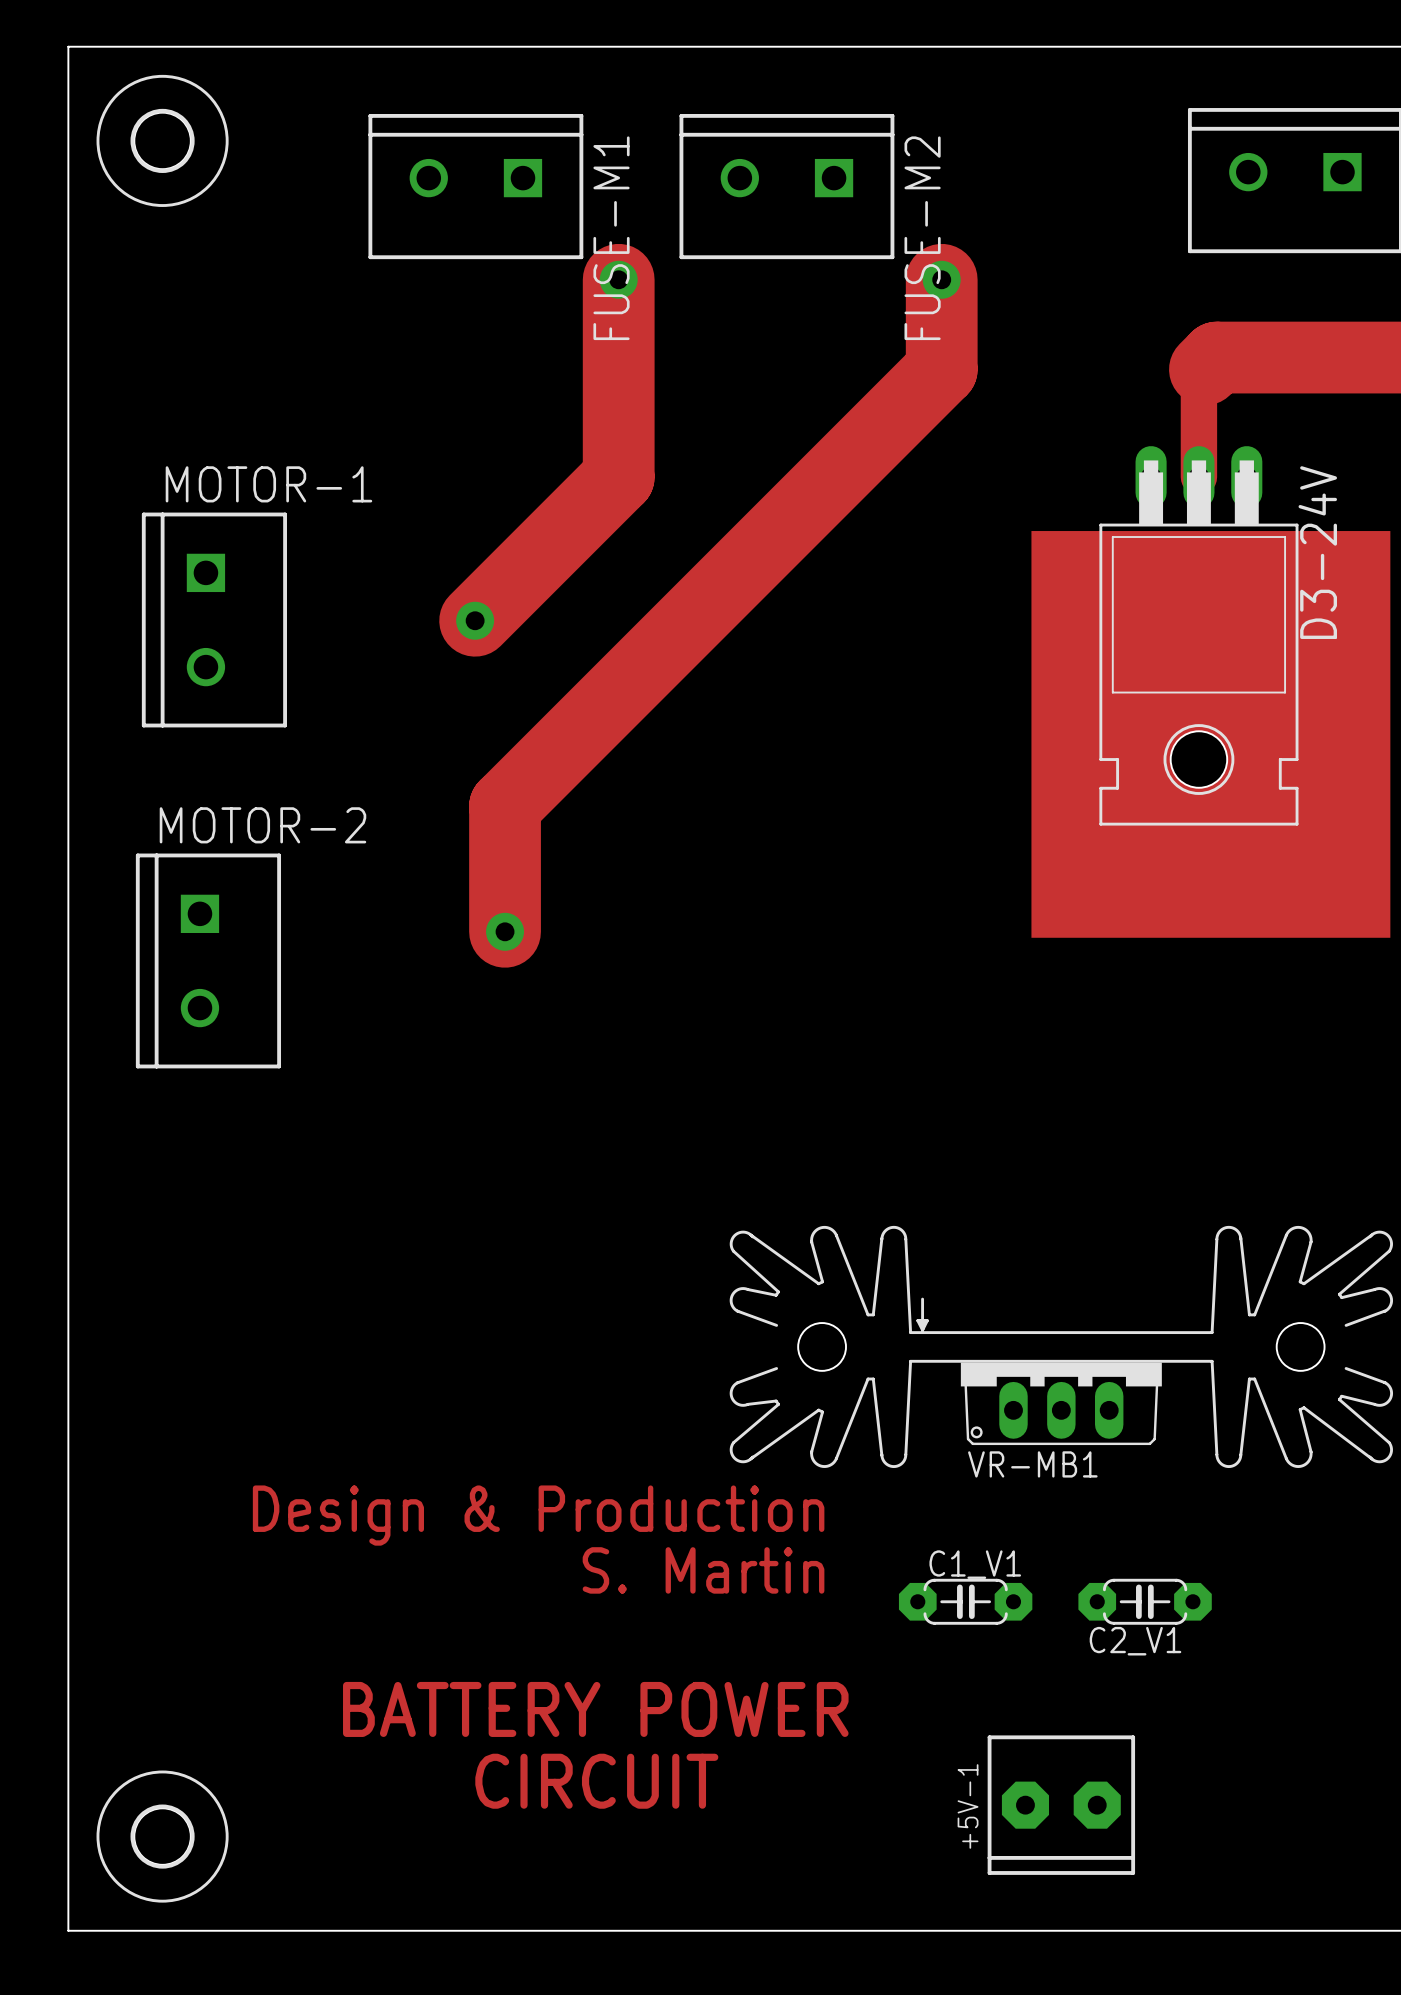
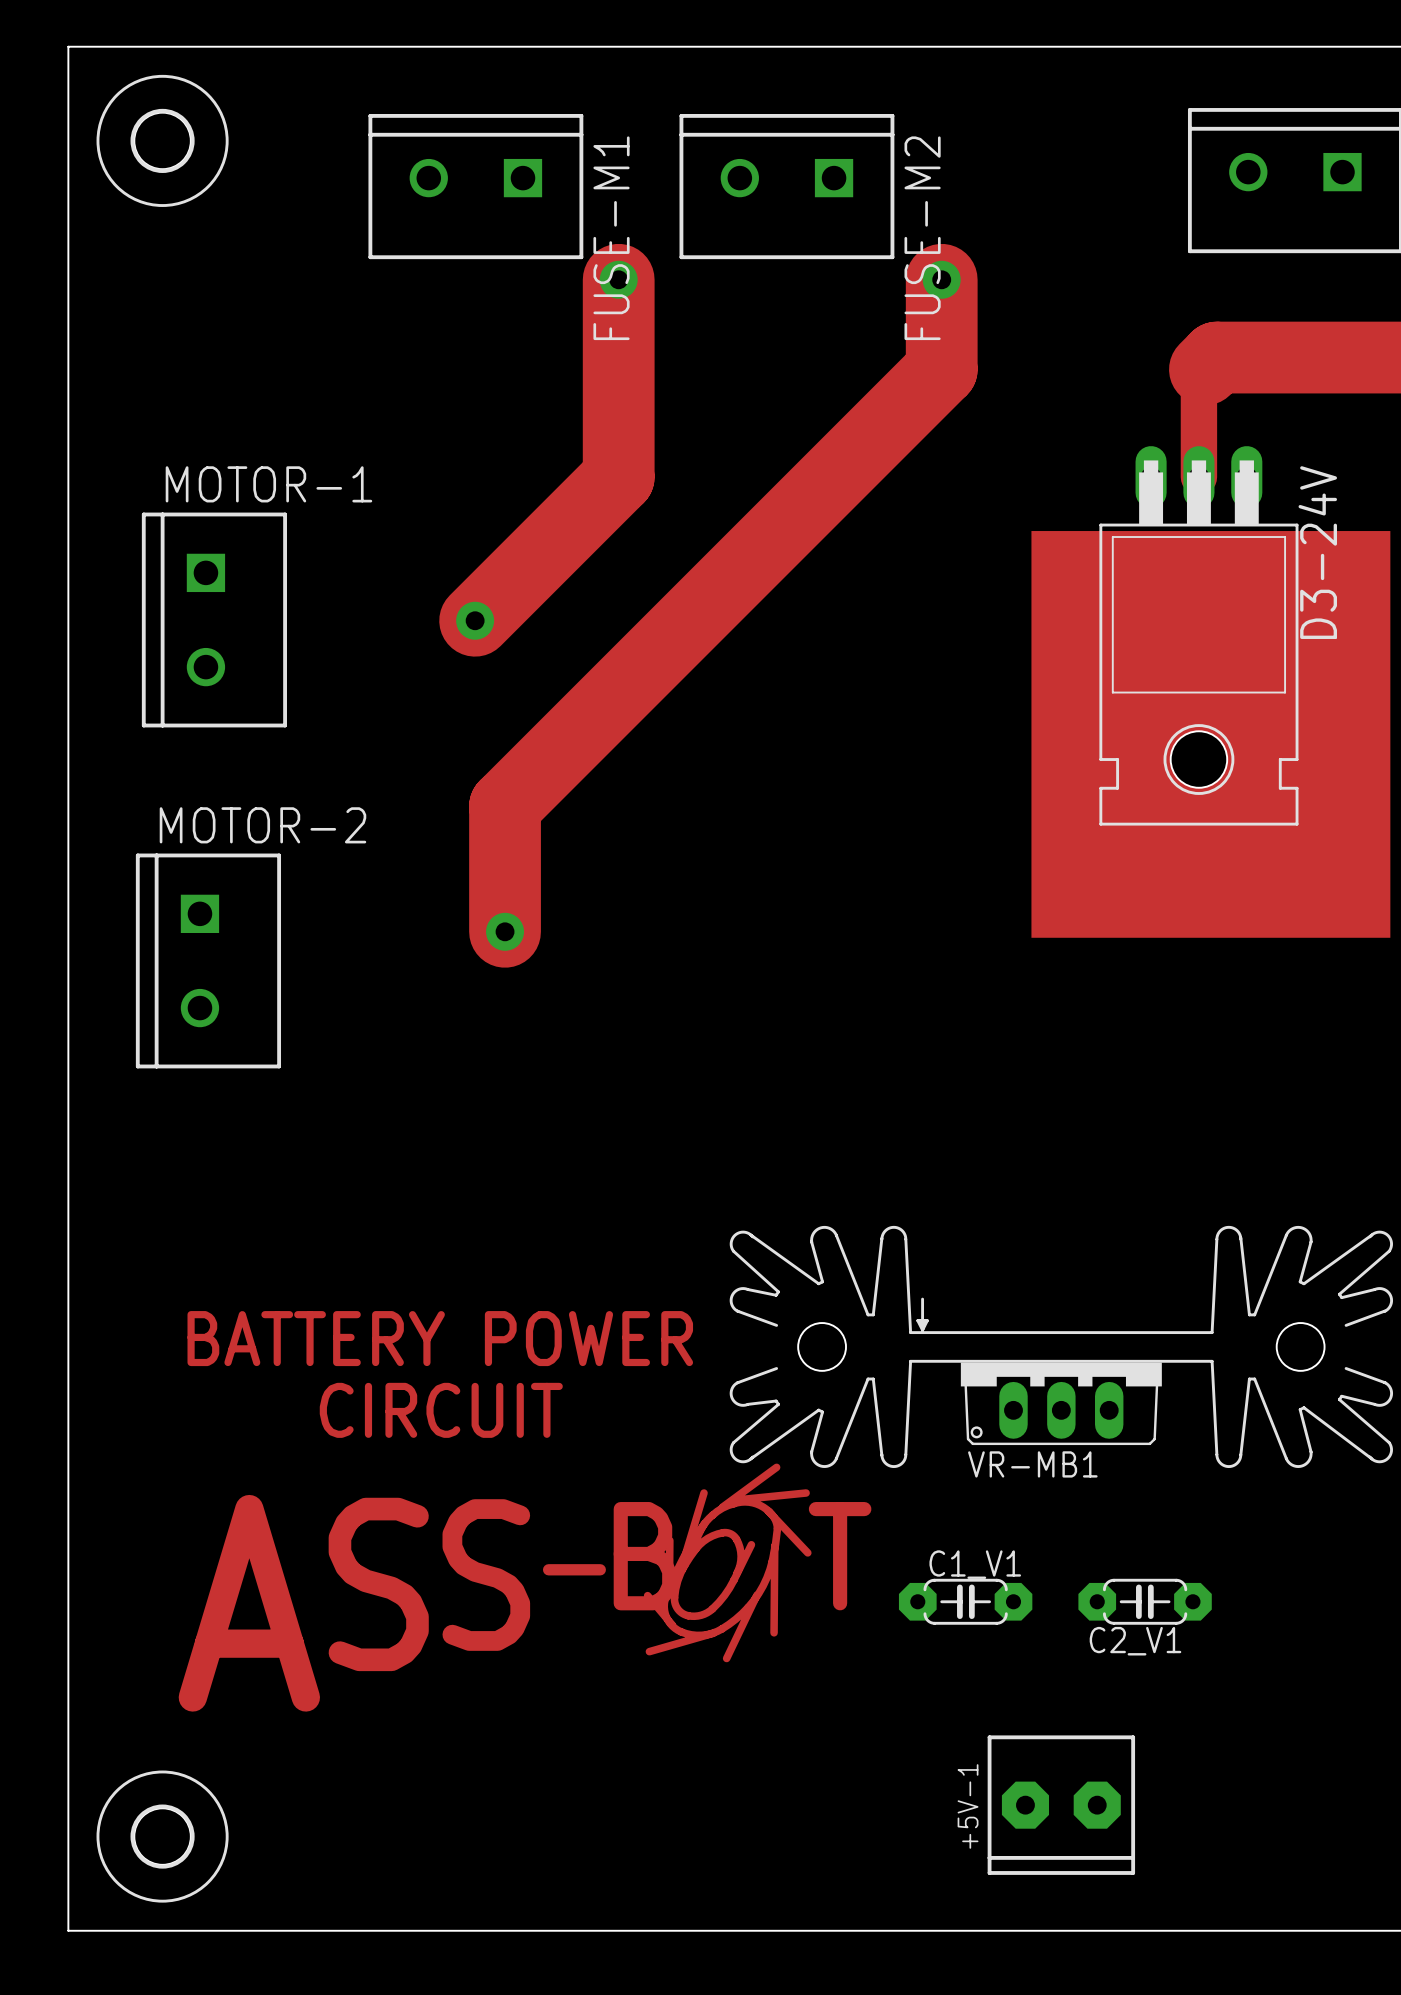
drawing: none -> [643, 1463, 812, 1663]
text: Design & Production (538, 1515) -> none
text: S. Martin (703, 1570) -> none
text position: BATTERY POWER (595, 1709) -> BATTERY POWER (440, 1338)
text position: CIRCUIT (596, 1781) -> CIRCUIT (441, 1410)

